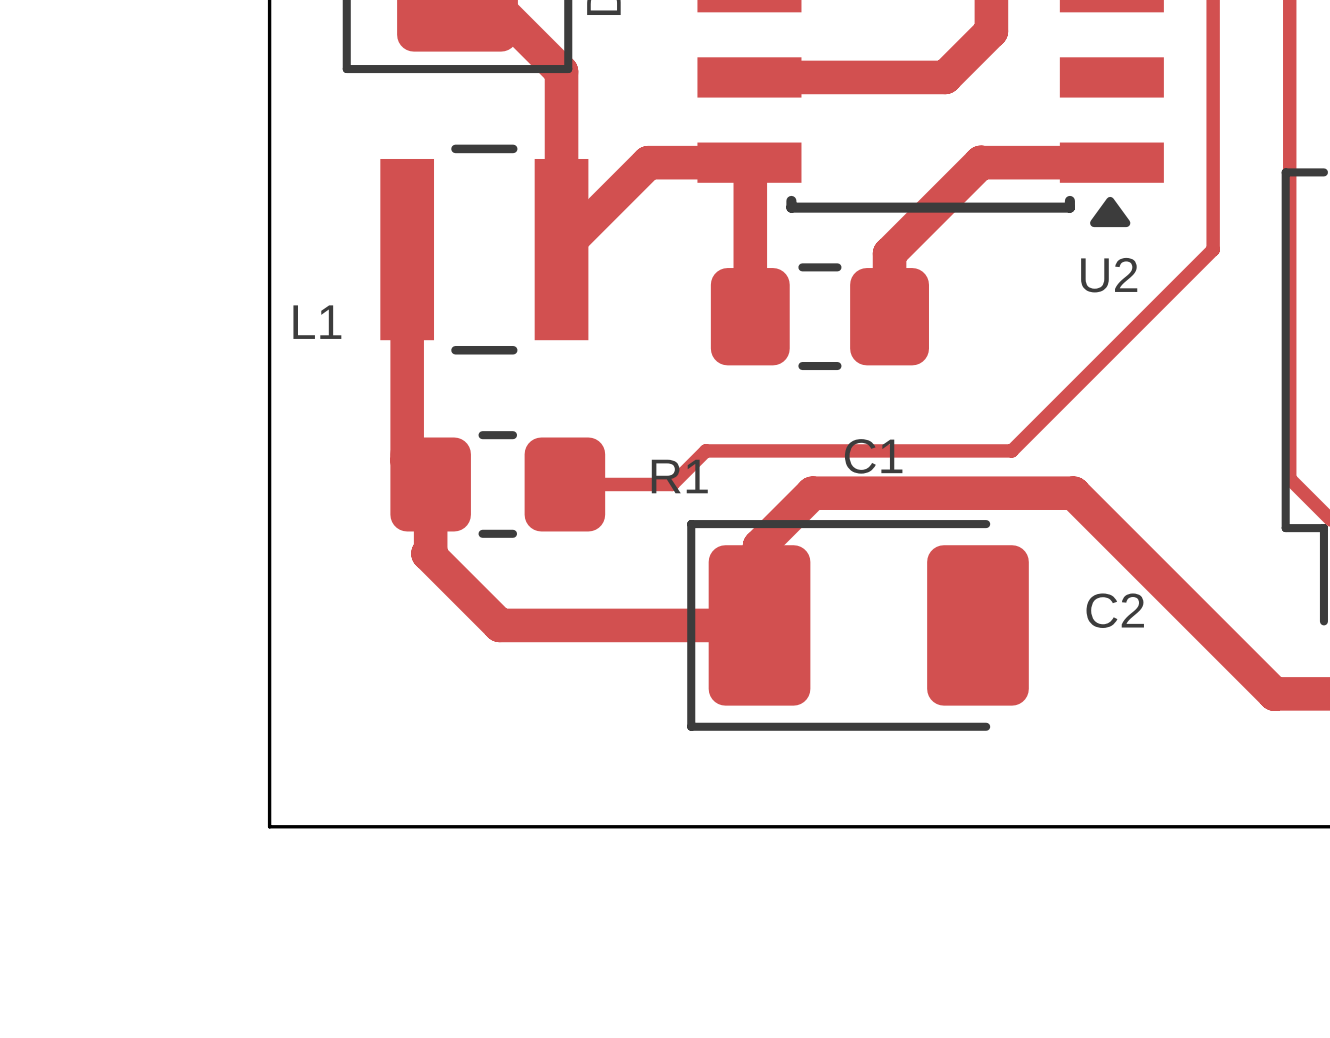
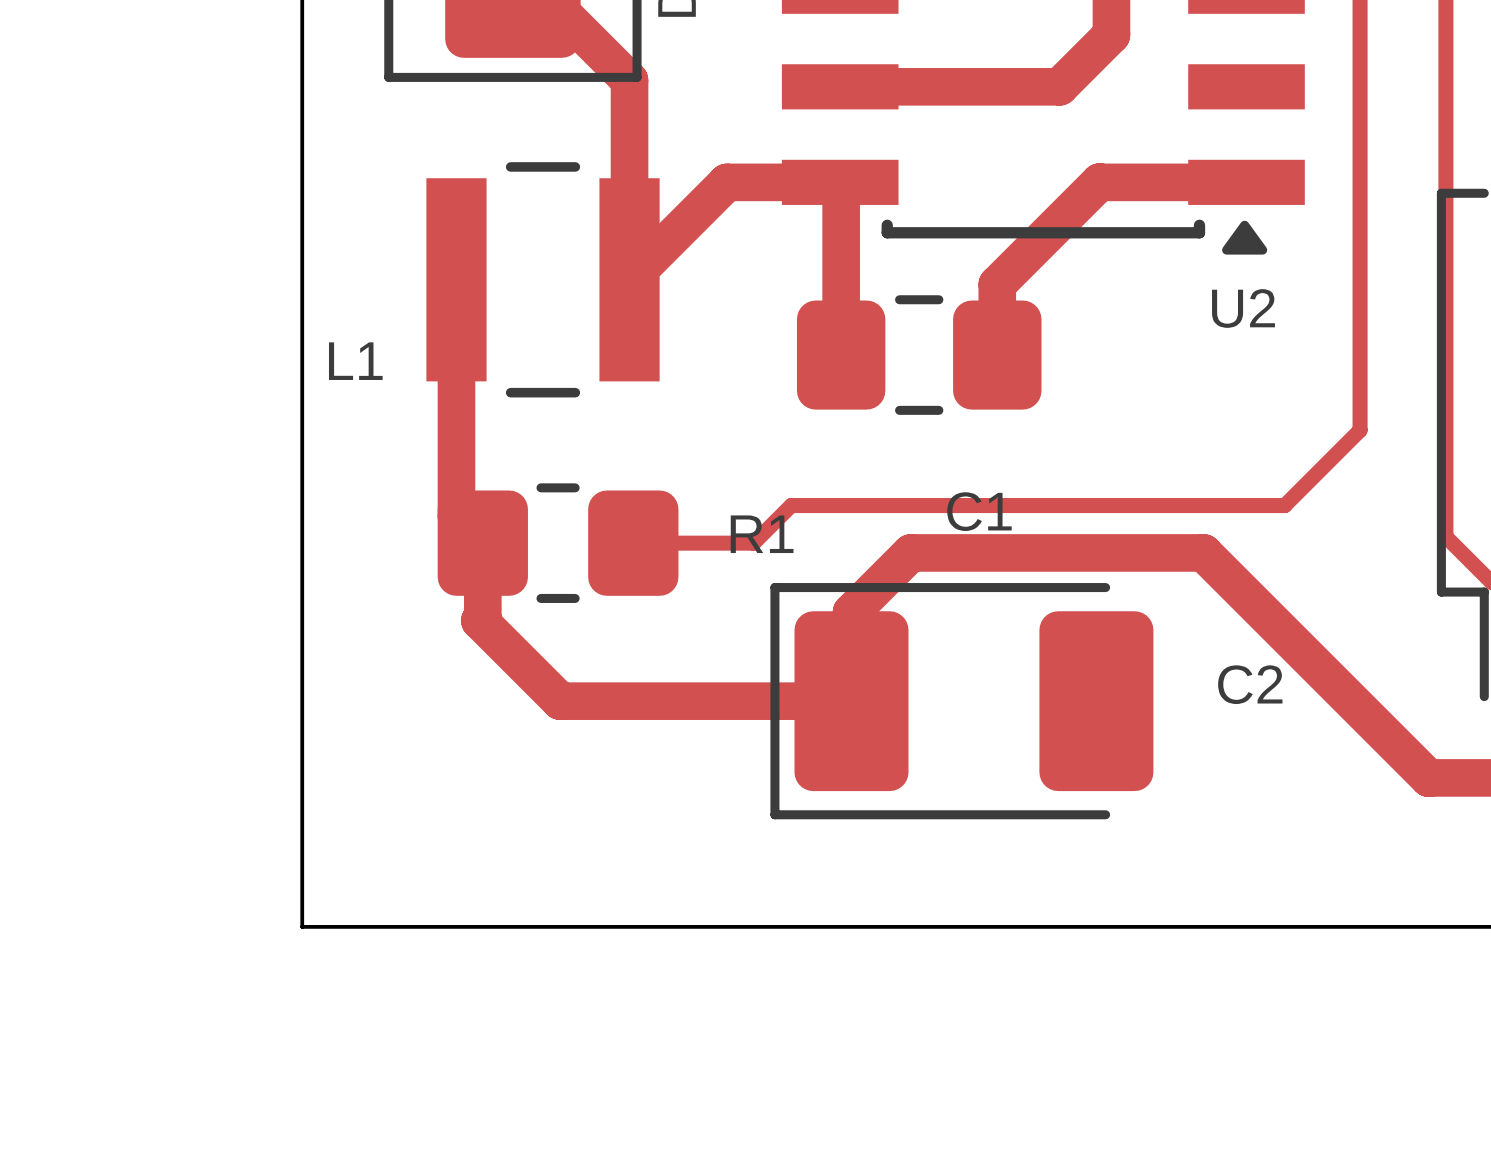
top track: (1213, 249) (1011, 450) -> (1360, 279) (1360, 430) (1284, 505) (1134, 505)

